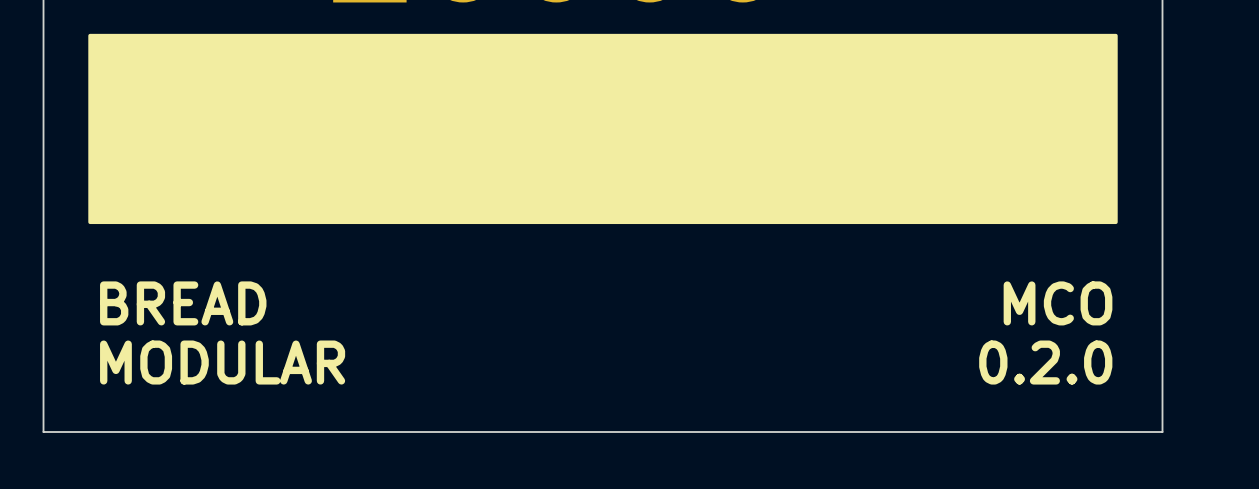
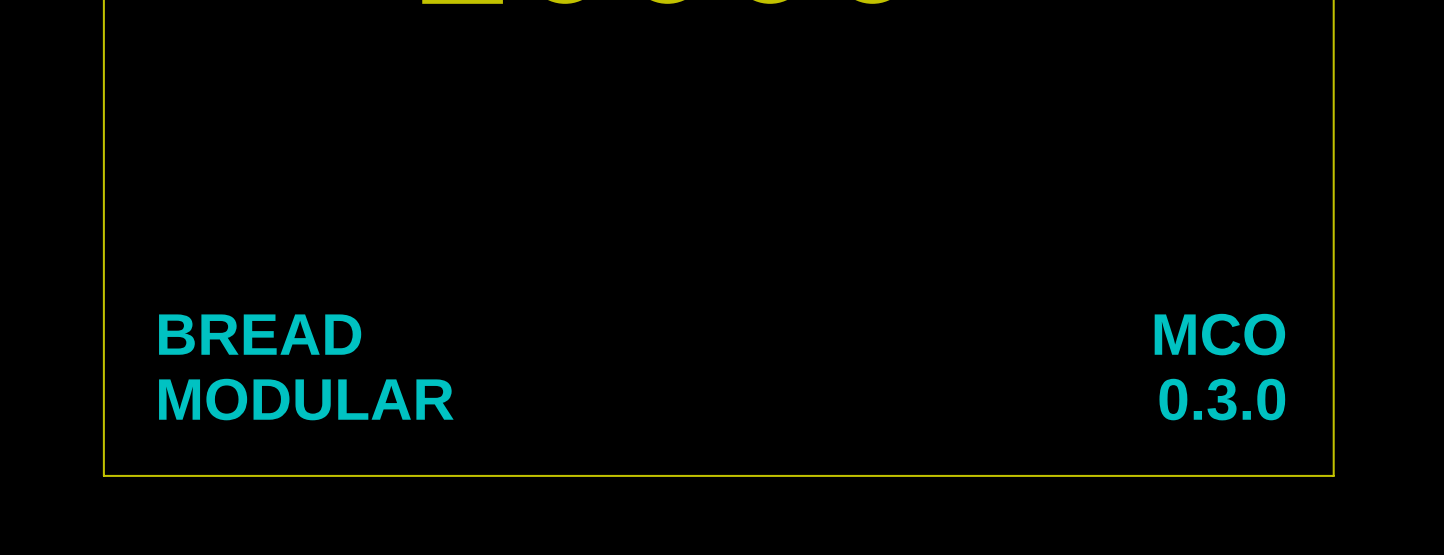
drawing: [88, 33, 1118, 225] -> none
text: 0.2.0 (1045, 362) -> 0.3.0 (1222, 399)

